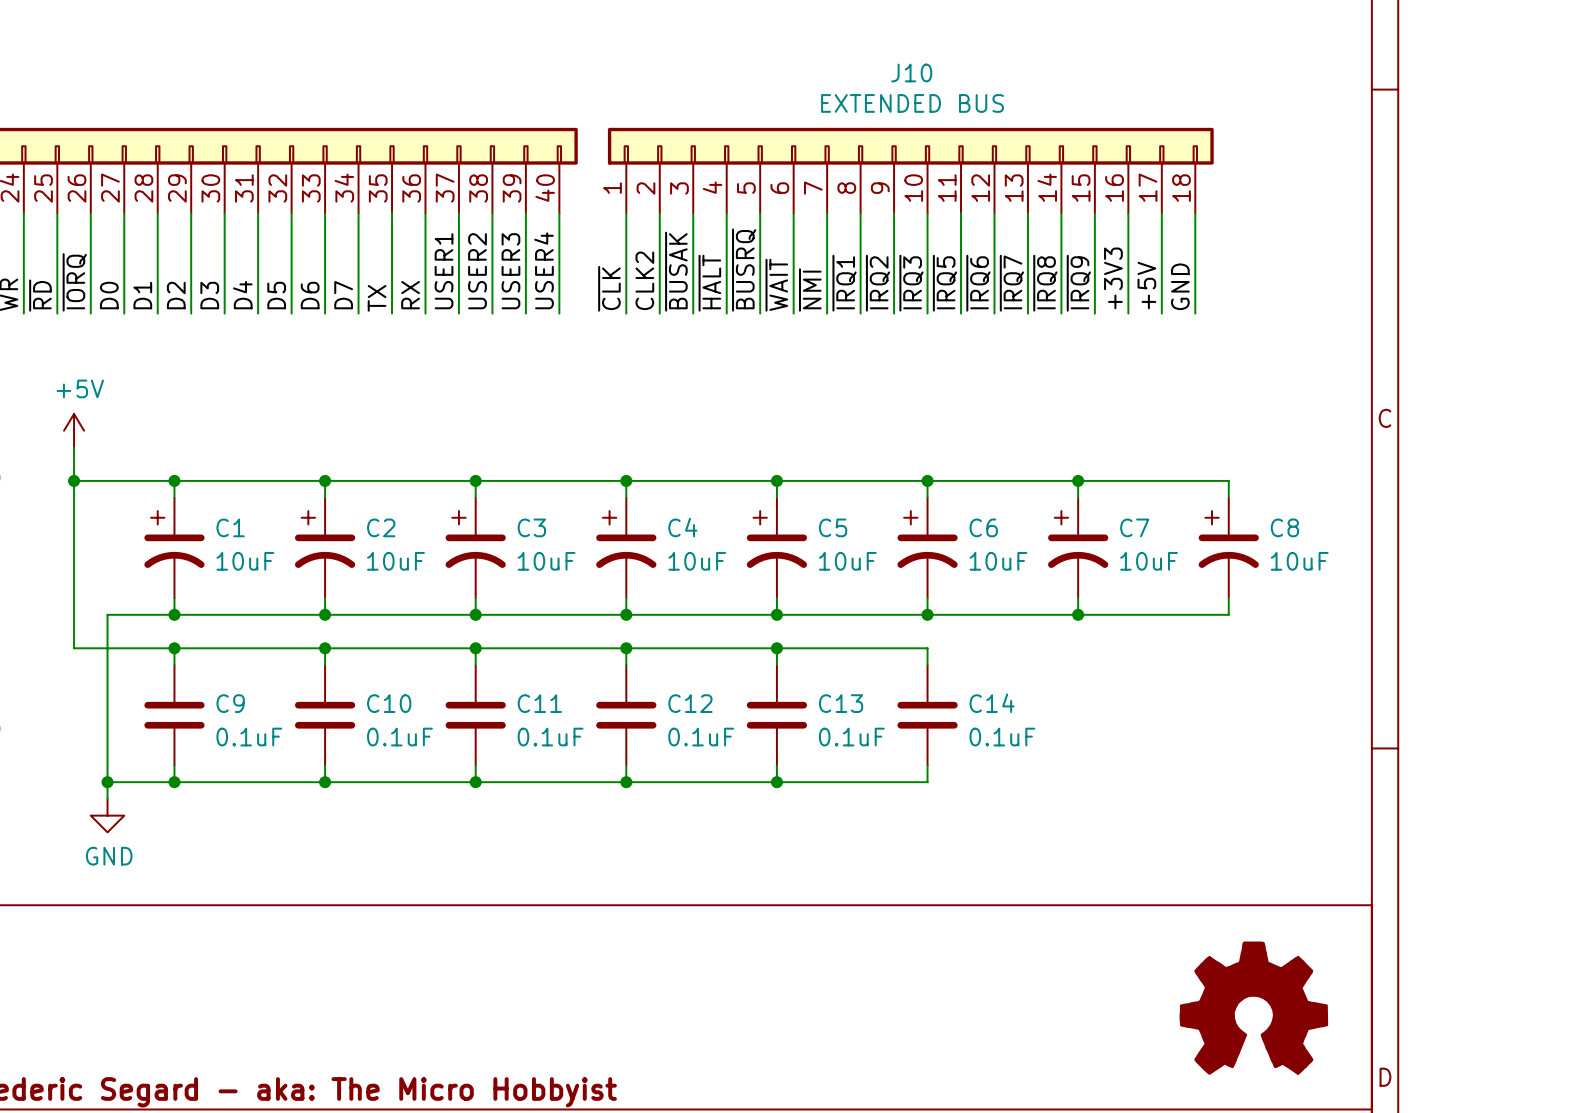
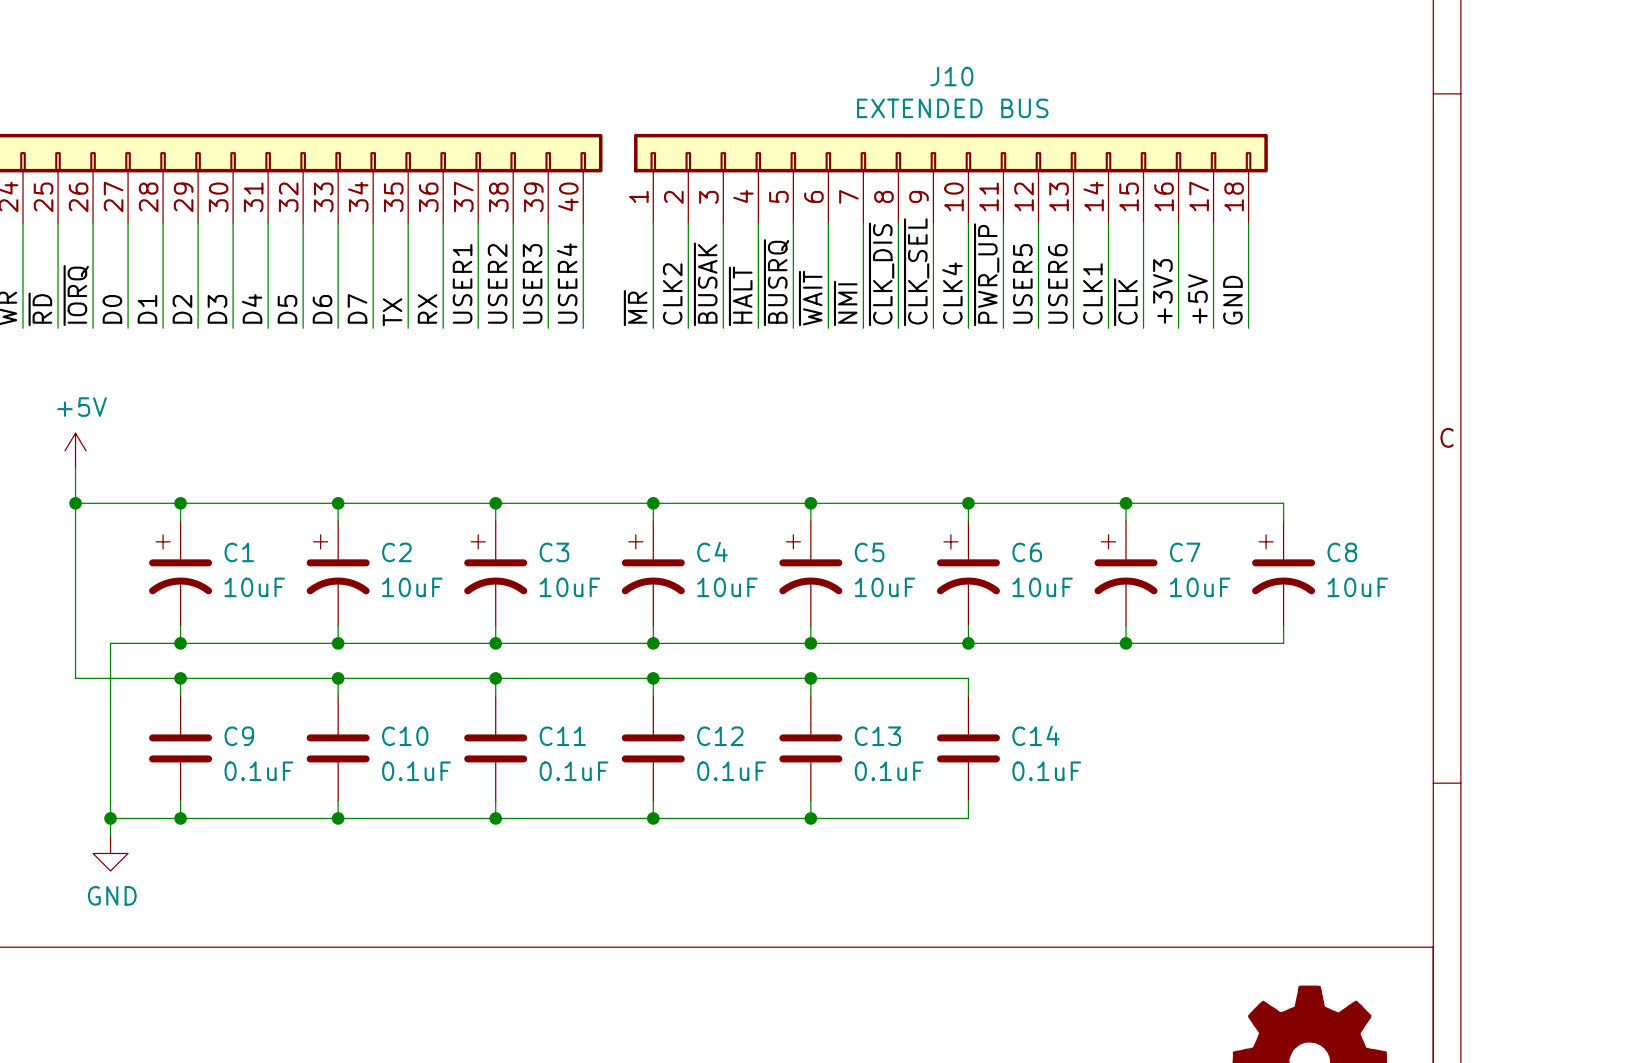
label: ~{IRQ1} (844, 283) -> ~{CLK_DIS} (881, 274)
label: ~{IRQ2} (878, 283) -> ~{CLK_SEL} (916, 272)
label: ~{IRQ3} (911, 283) -> CLK4 (952, 293)
label: ~{IRQ5} (944, 283) -> ~{PWR_UP} (986, 274)
label: ~{IRQ6} (978, 283) -> USER5 (1022, 283)
label: ~{IRQ7} (1011, 283) -> USER6 (1057, 283)
label: ~{IRQ8} (1045, 283) -> CLK1 (1092, 293)
label: ~{IRQ9} (1078, 283) -> ~{CLK} (1125, 302)
label: ~{CLK} (609, 288) -> ~{MR} (635, 308)

